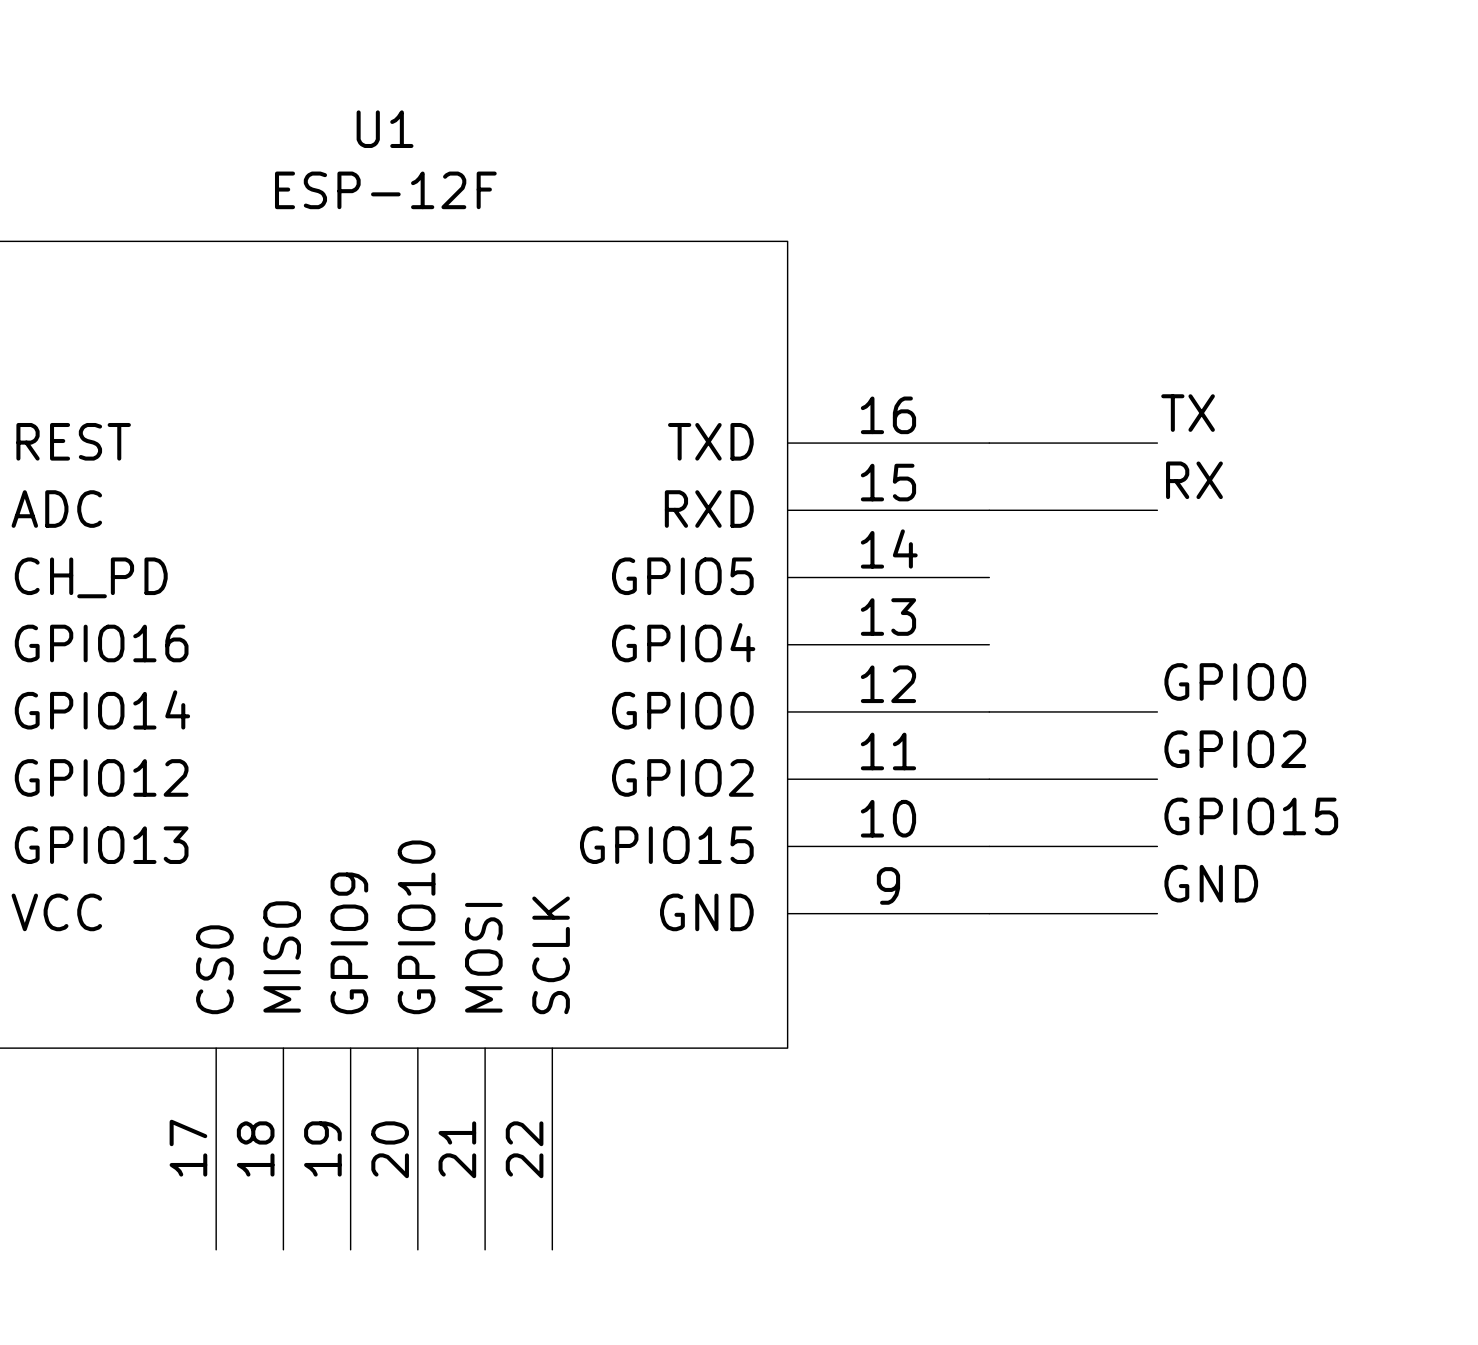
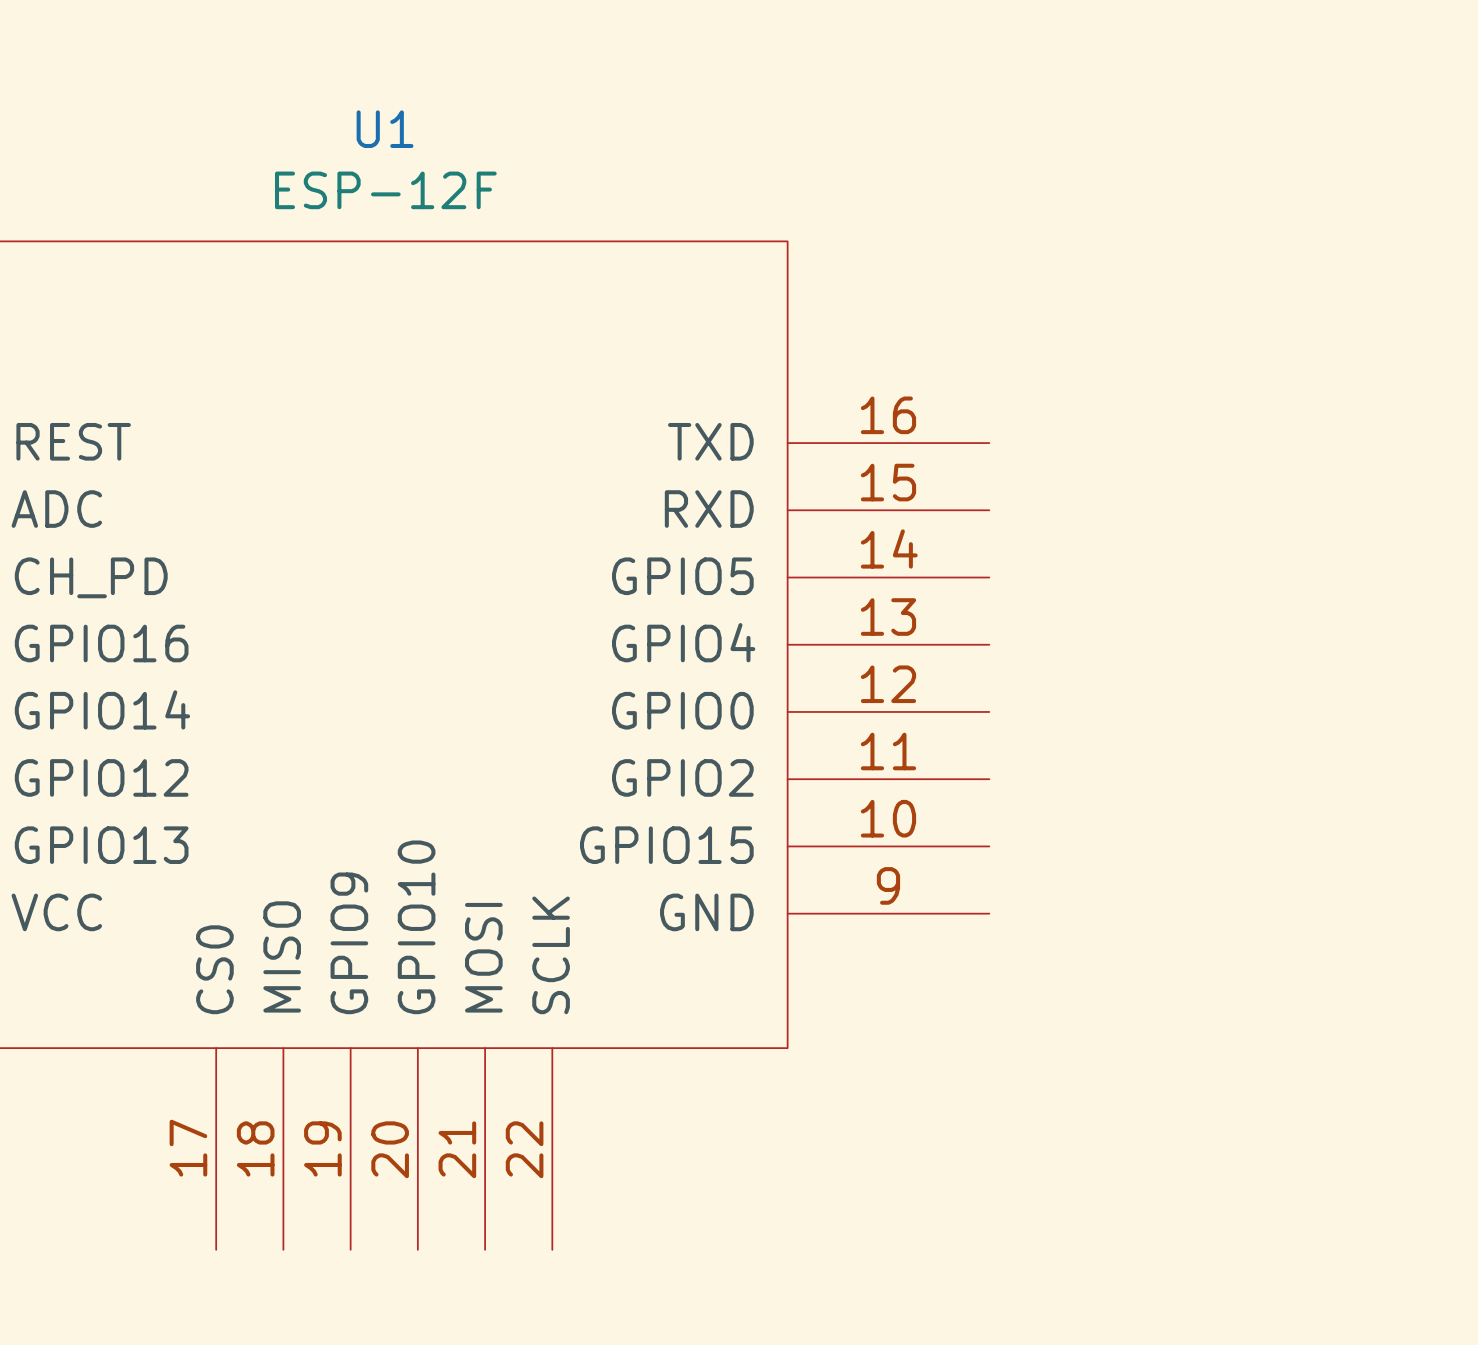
label: TX (1188, 413) -> none
wire: (989, 443) (1157, 443) -> none
label: RX (1194, 480) -> none
wire: (989, 510) (1157, 510) -> none
label: GPIO0 (1235, 681) -> none
wire: (989, 711) (1157, 711) -> none
label: GPIO2 (1235, 749) -> none
wire: (989, 779) (1157, 779) -> none
label: GPIO15 (1251, 816) -> none
wire: (989, 846) (1157, 846) -> none
label: GND (1211, 883) -> none
wire: (989, 913) (1157, 913) -> none

